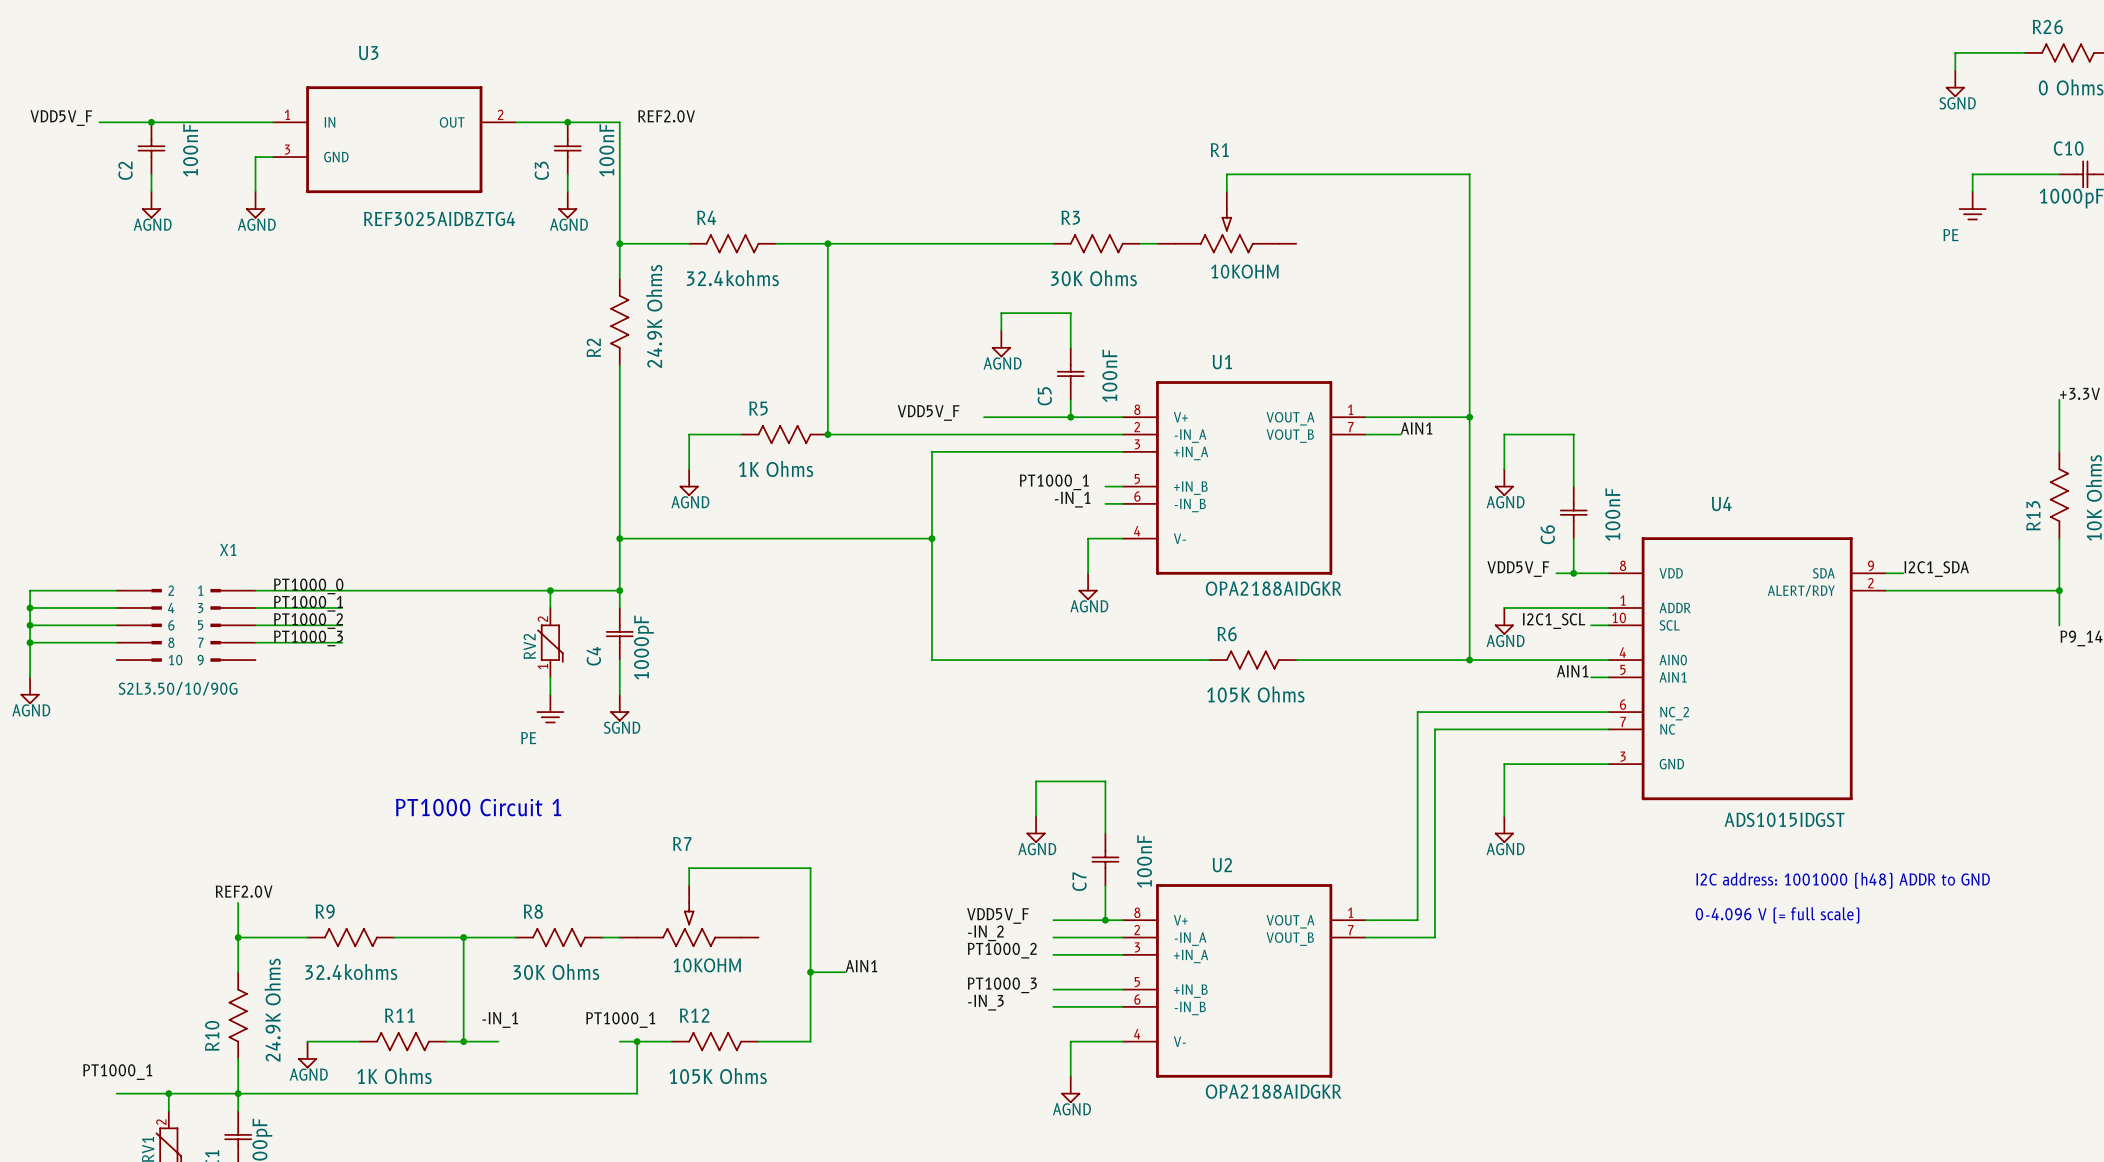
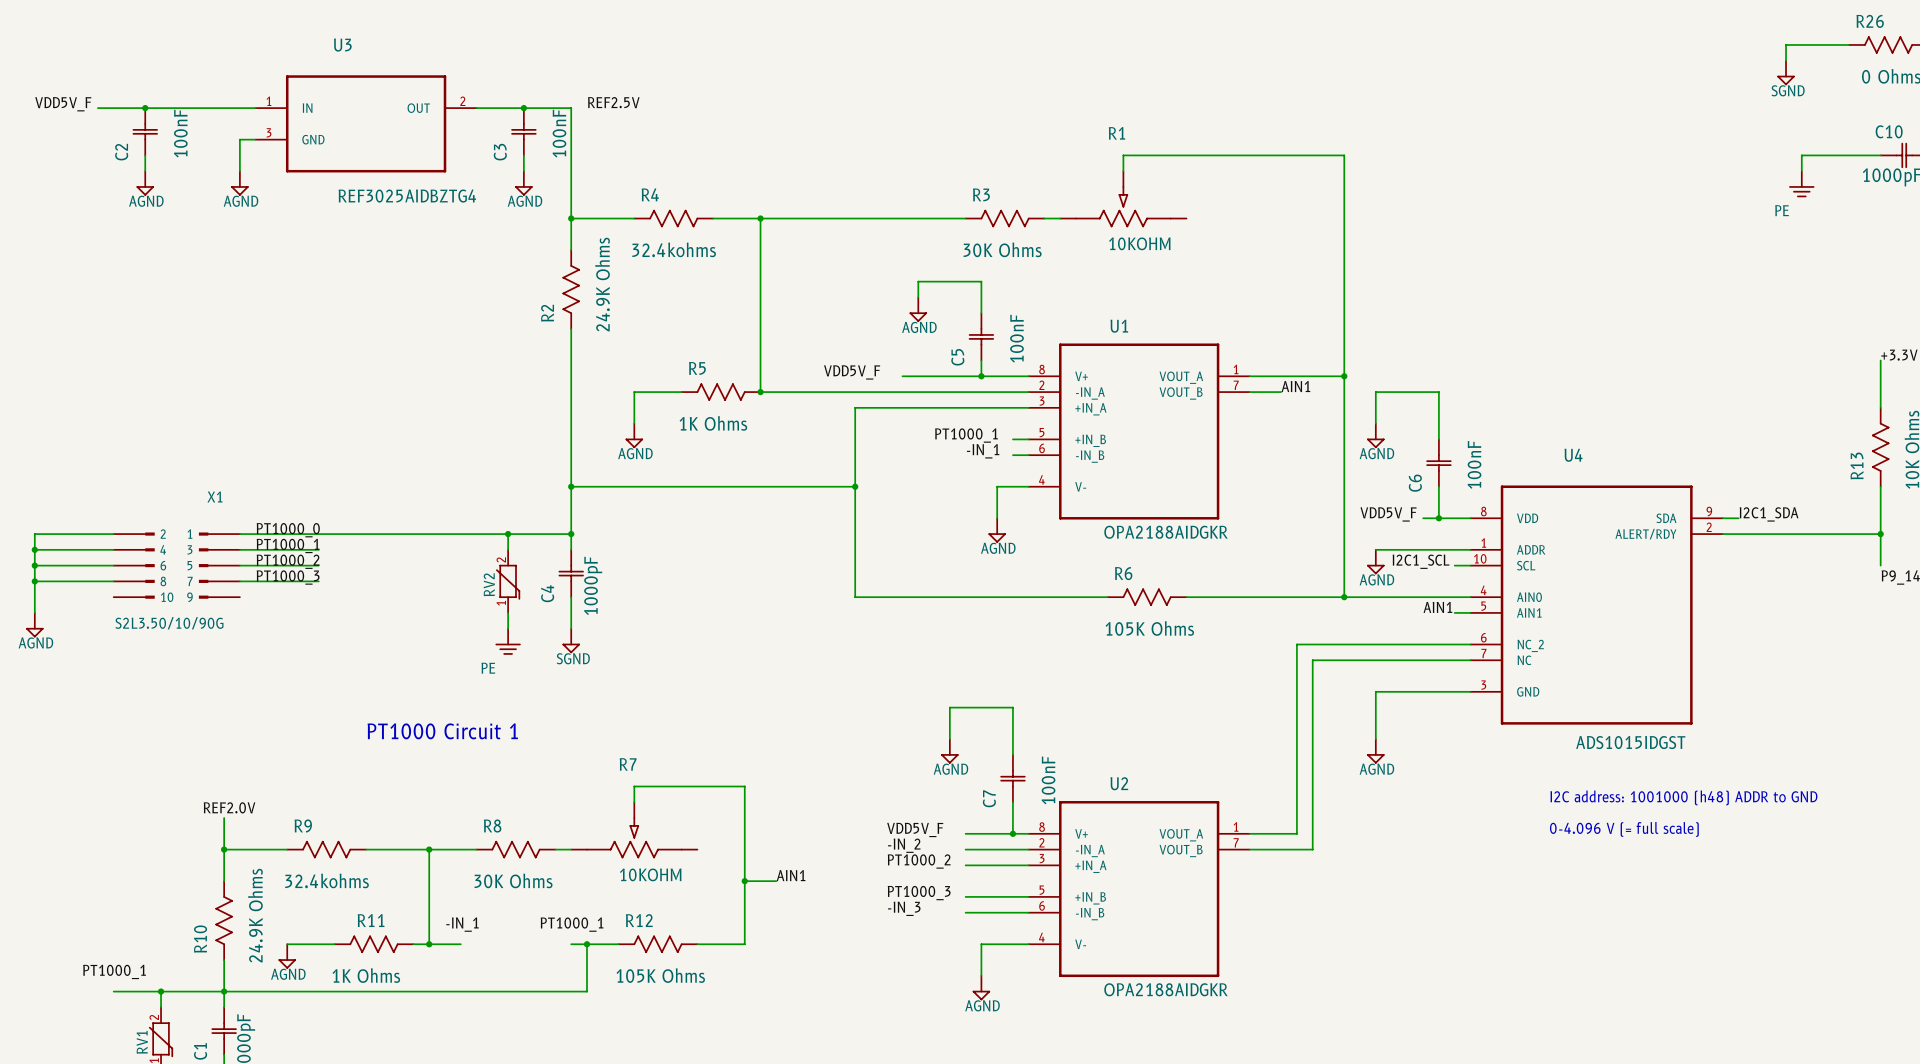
label: REF2.0V (666, 116) -> REF2.5V (613, 102)

